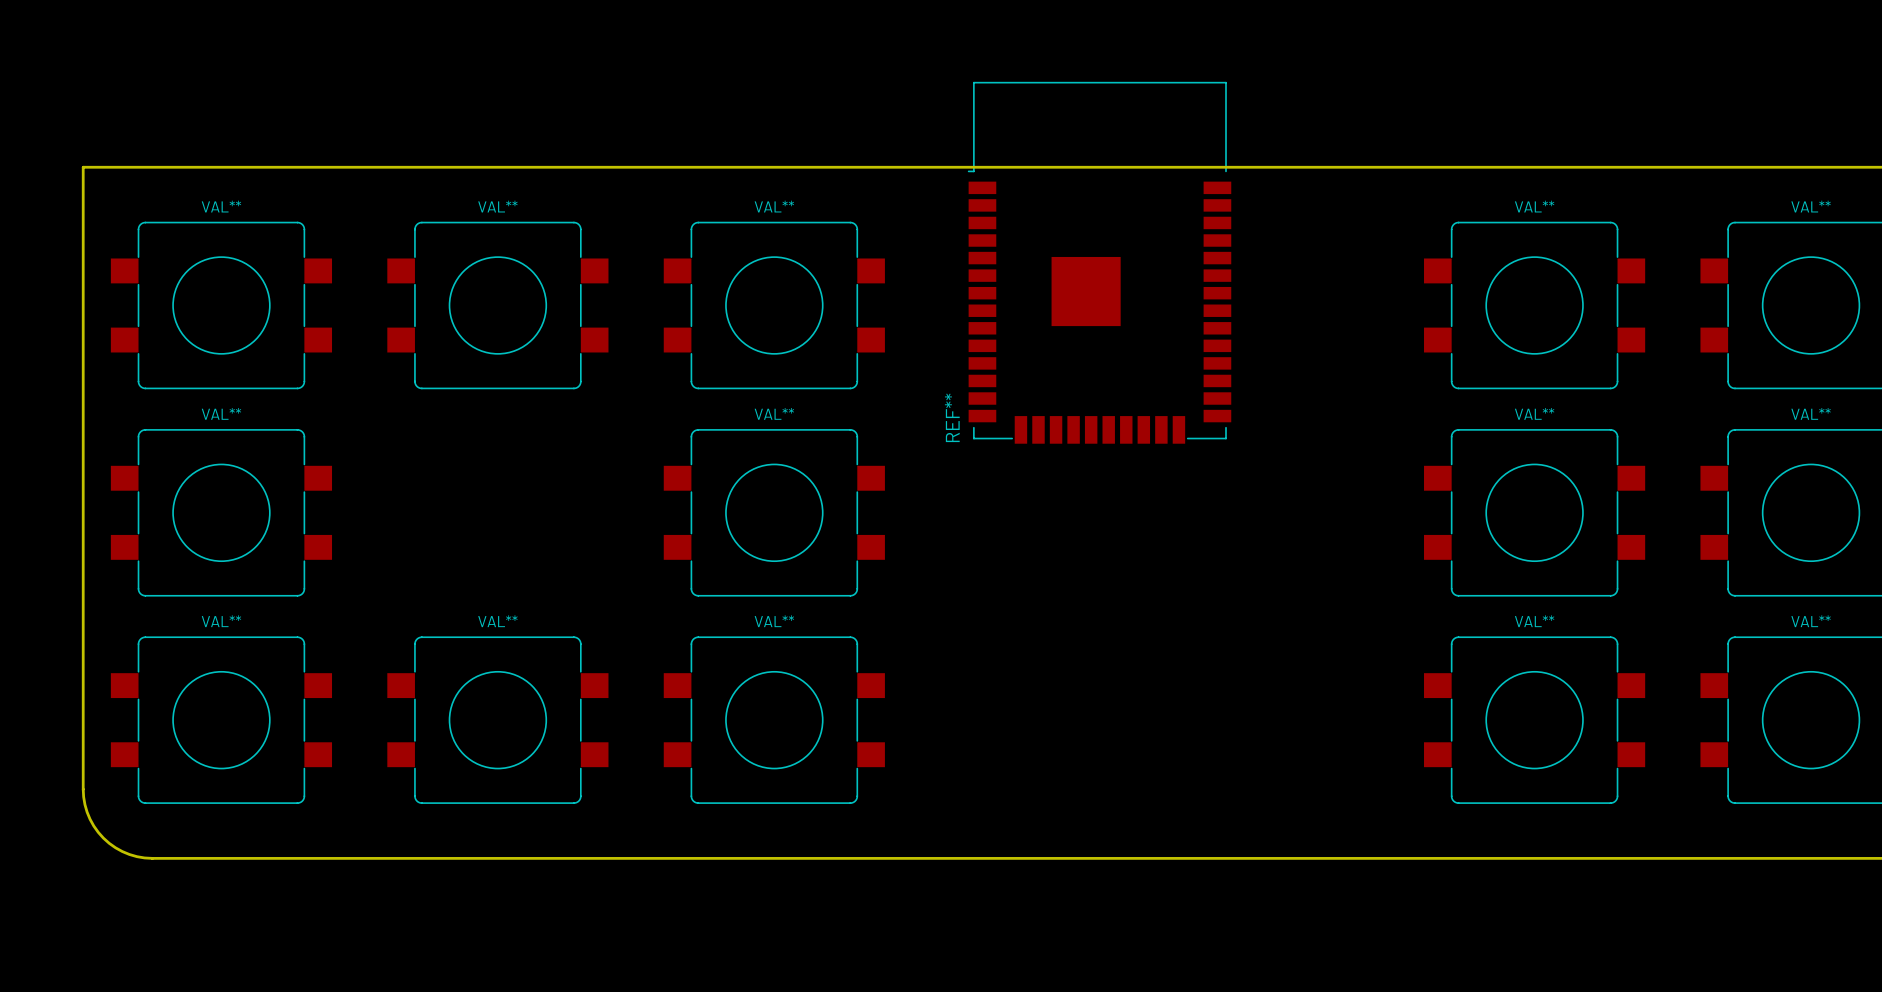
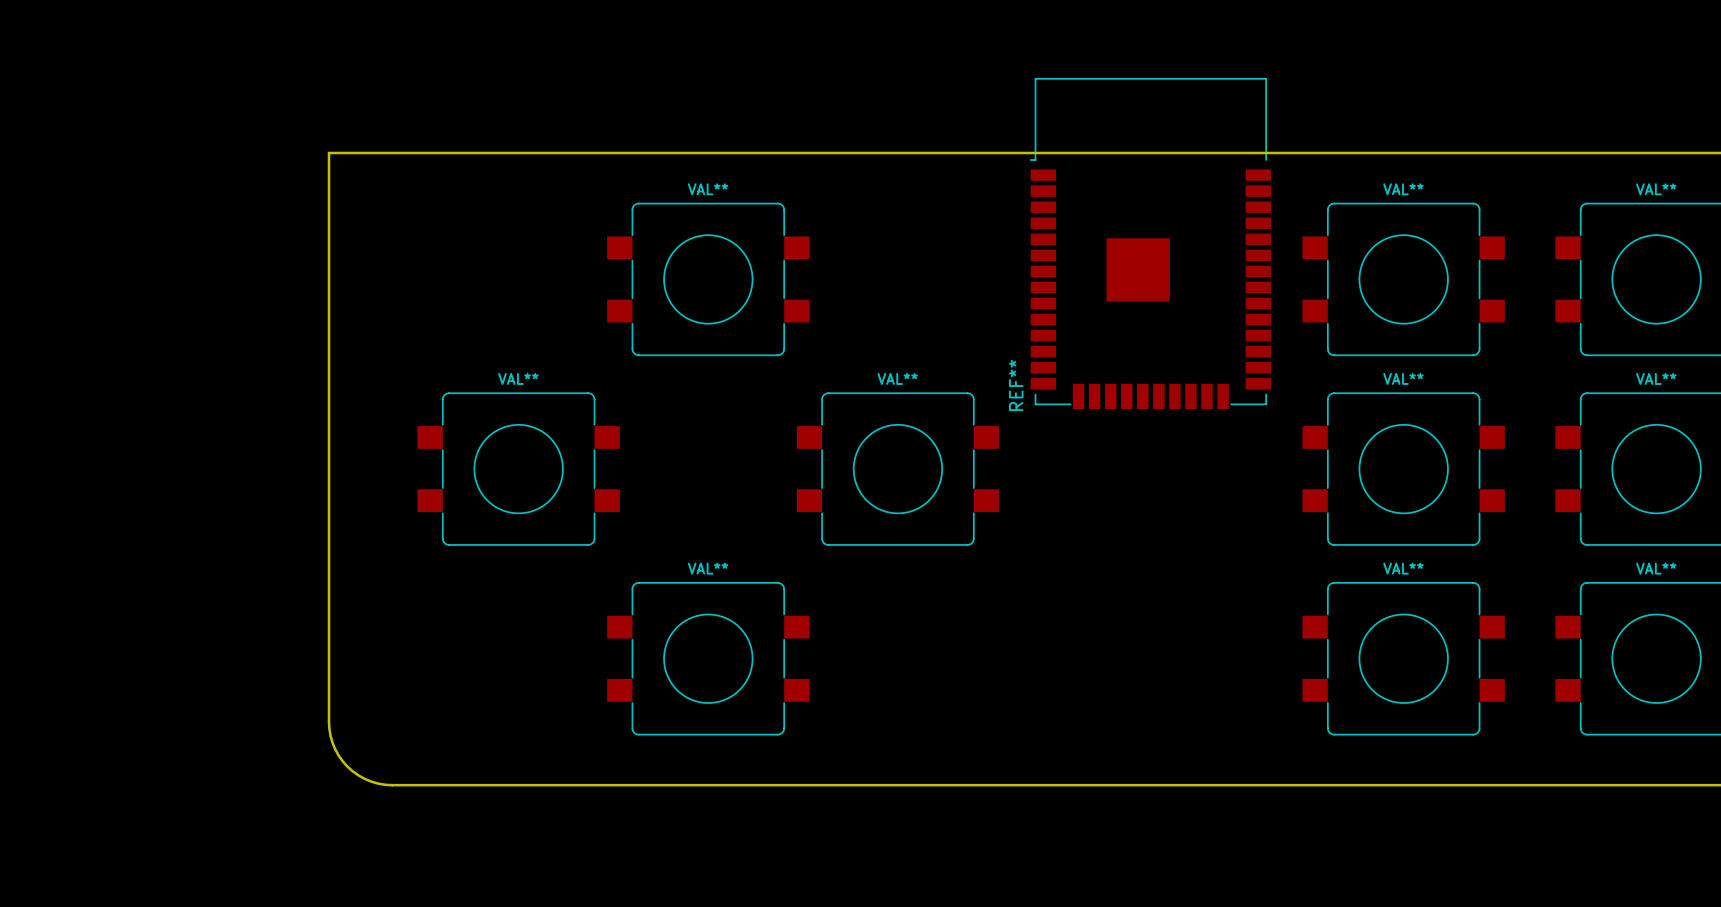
board edge: (359, 167) (83, 167) (83, 797) (87, 812) (98, 832) (115, 847) (136, 856) (152, 858) (428, 858) -> (328, 152) (329, 729) (335, 749) (347, 766) (358, 775) (371, 781) (392, 785)
REF** position: (1099, 262) -> (1150, 243)
VAL**: (221, 305) -> none
VAL**: (497, 305) -> none
VAL**: (221, 512) -> none
VAL**: none -> (518, 469)
VAL**: (774, 512) -> none
VAL**: none -> (897, 469)
VAL**: (221, 720) -> none
VAL**: (497, 720) -> none

